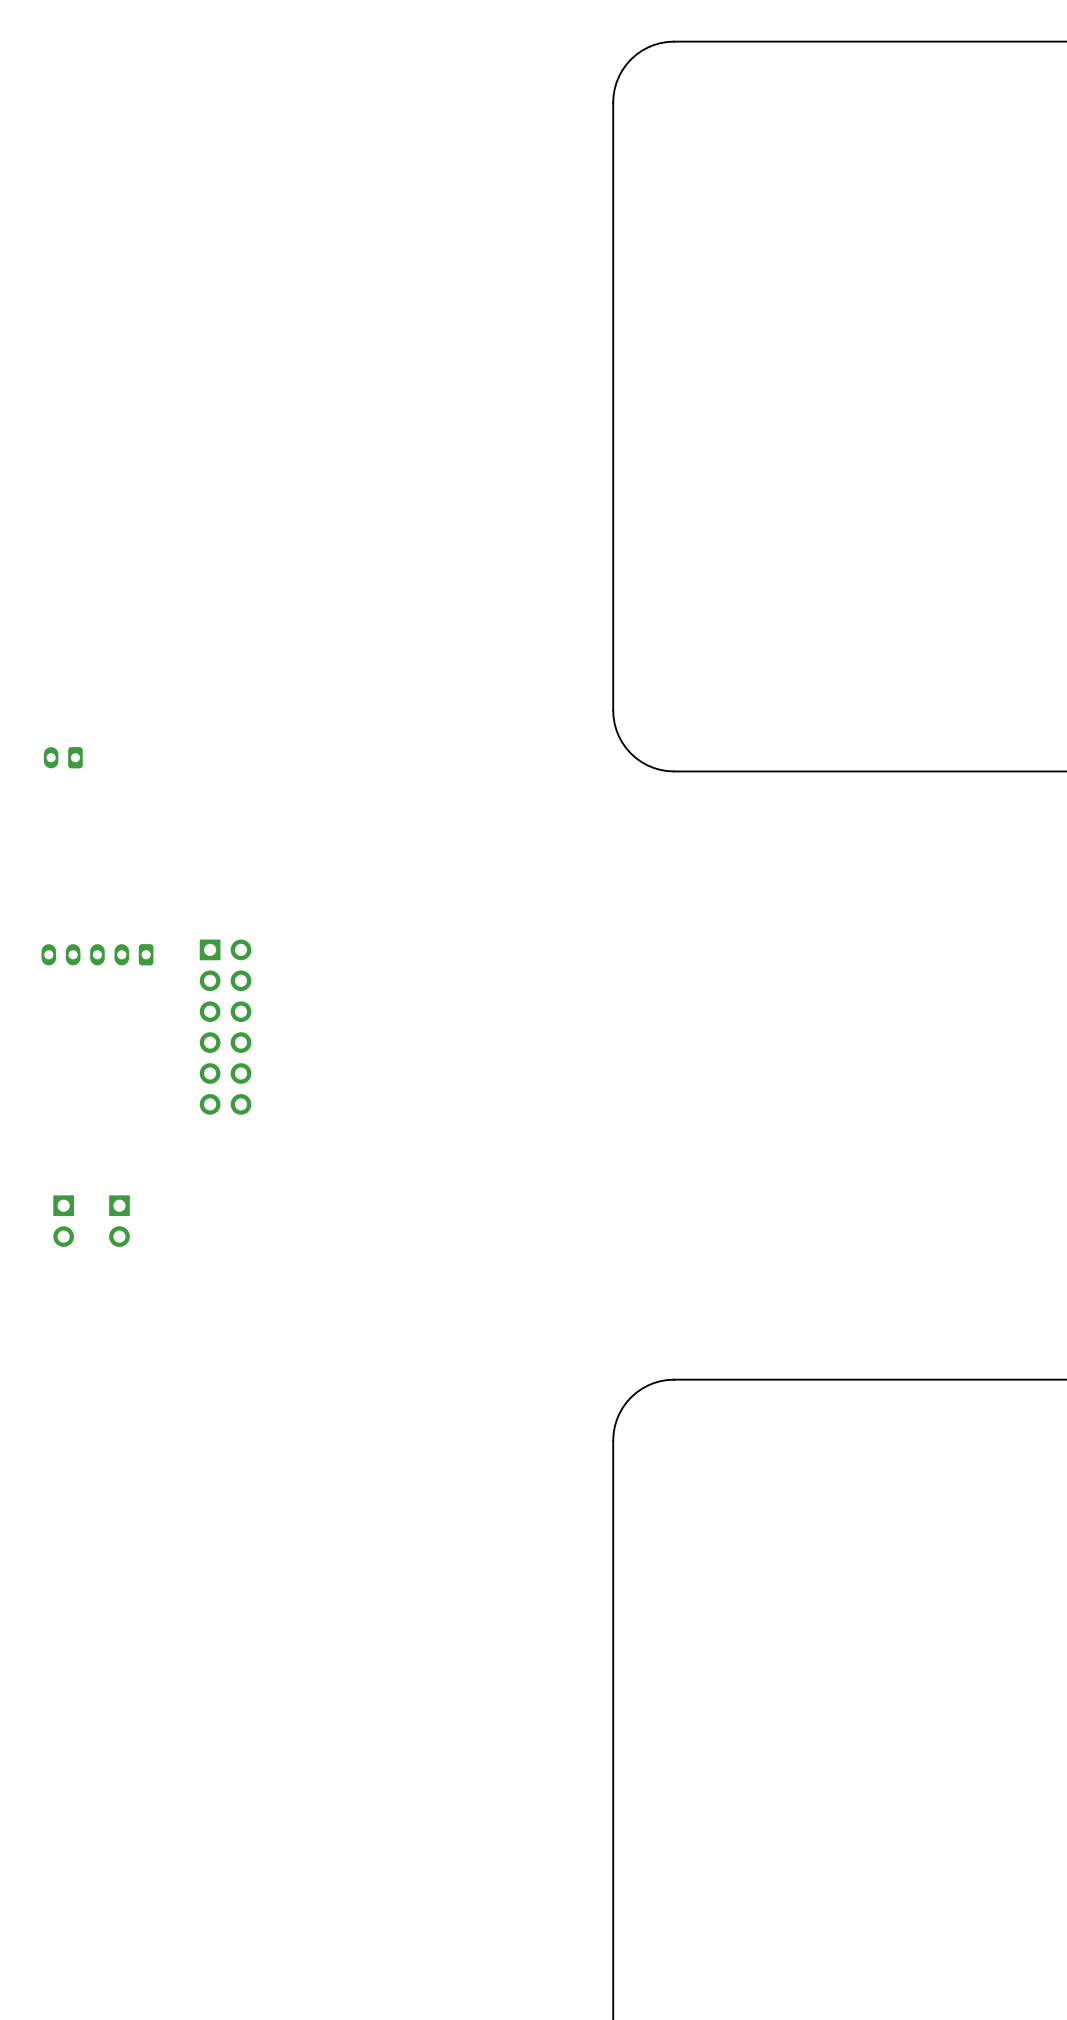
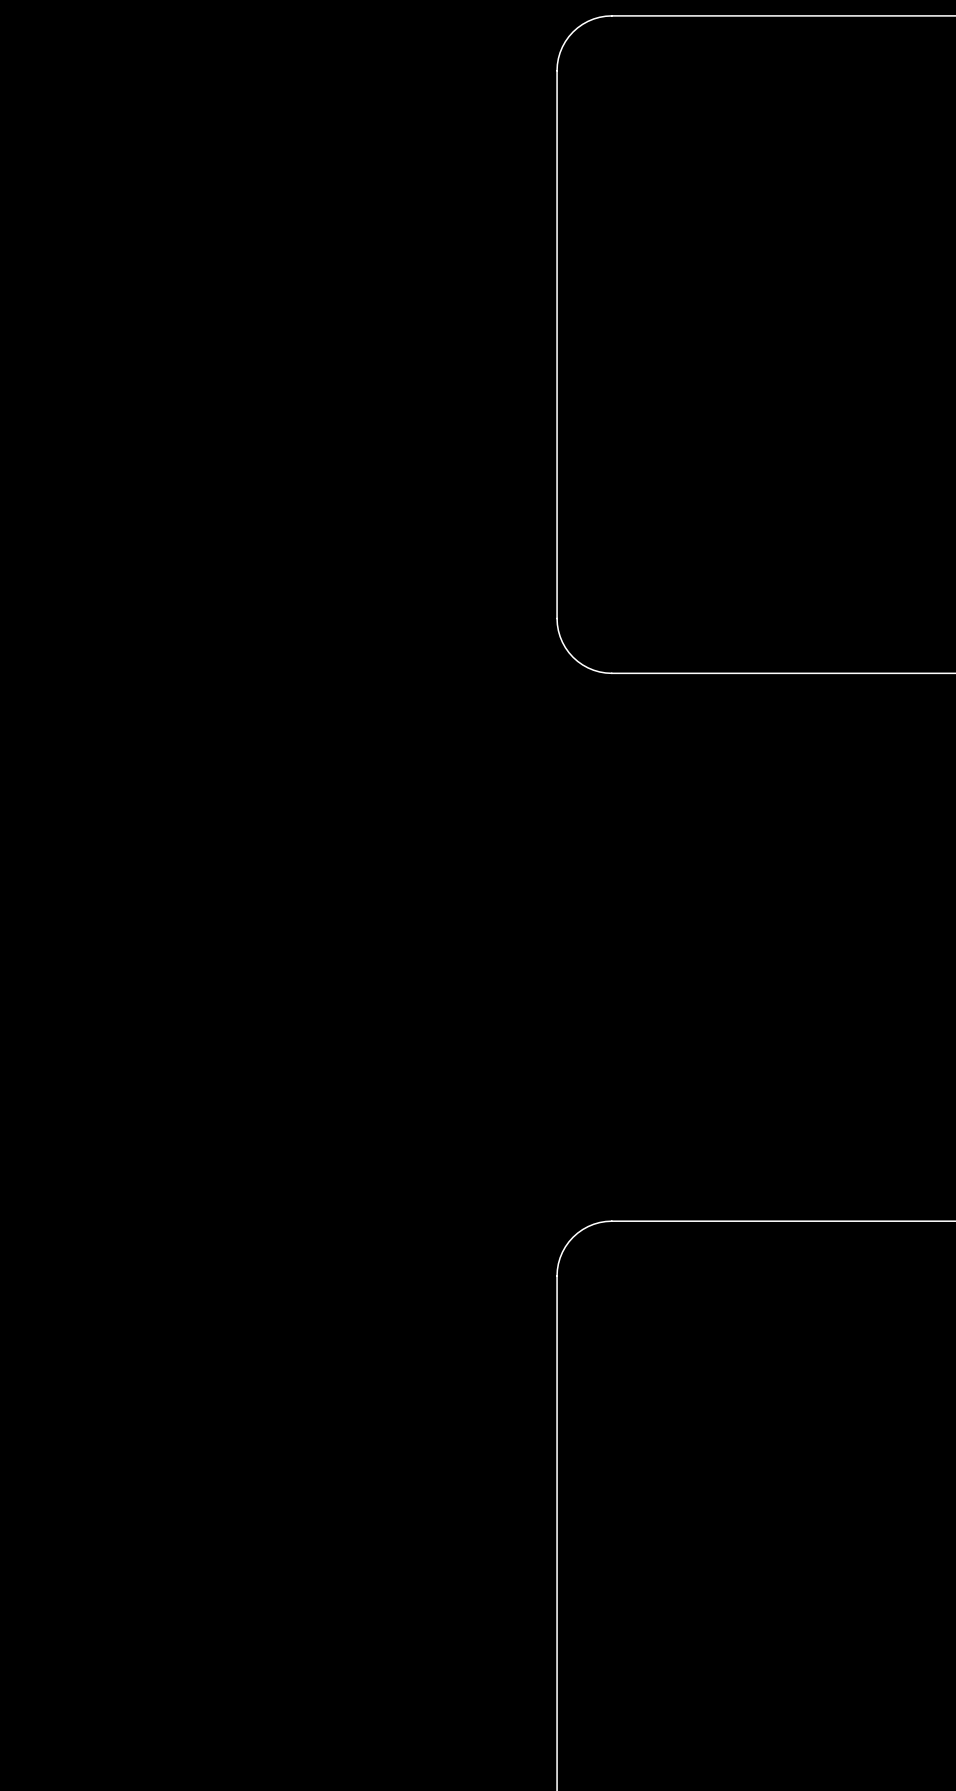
part: (63, 757) -> none
part: (97, 954) -> none
part: (225, 1027) -> none
part: (63, 1221) -> none
part: (119, 1221) -> none

